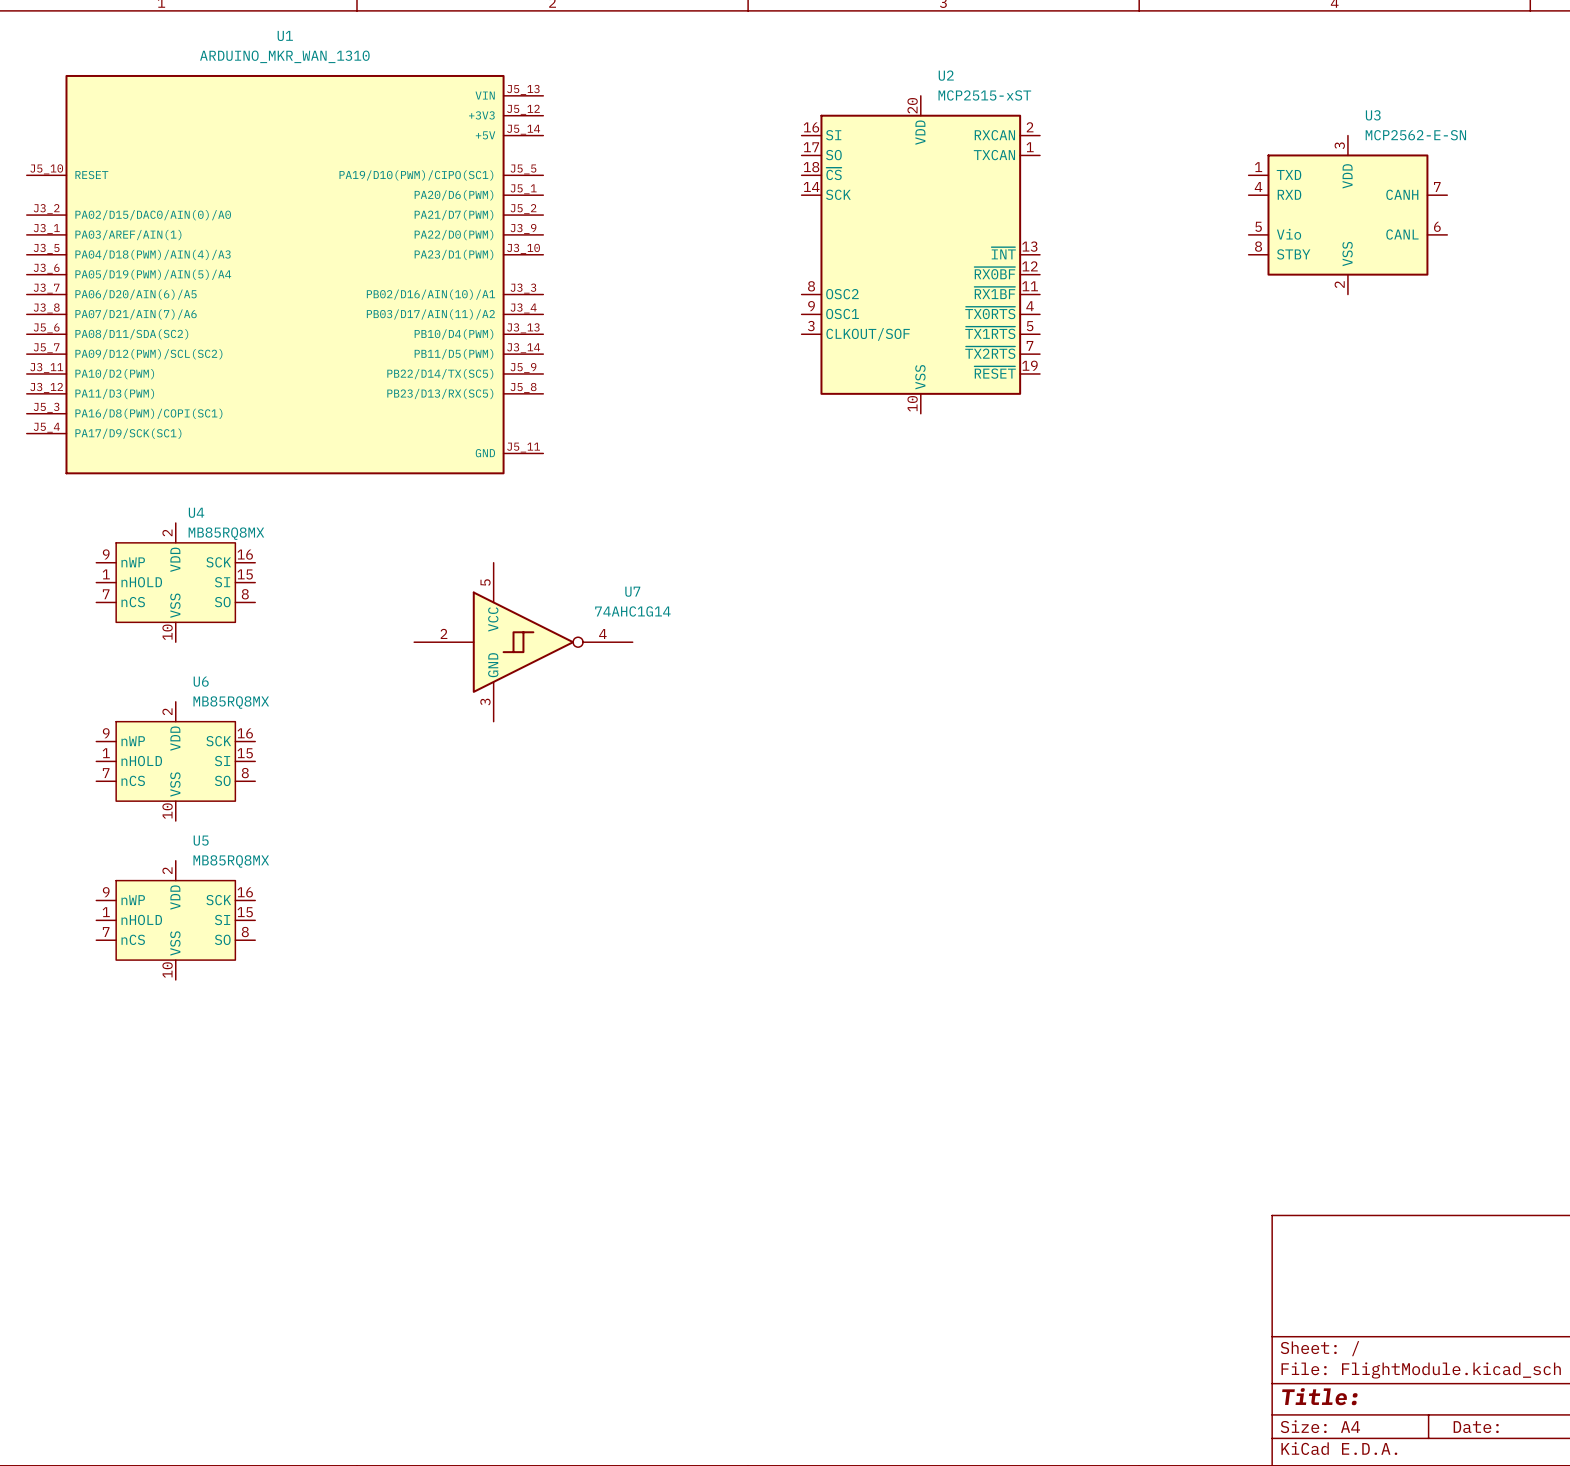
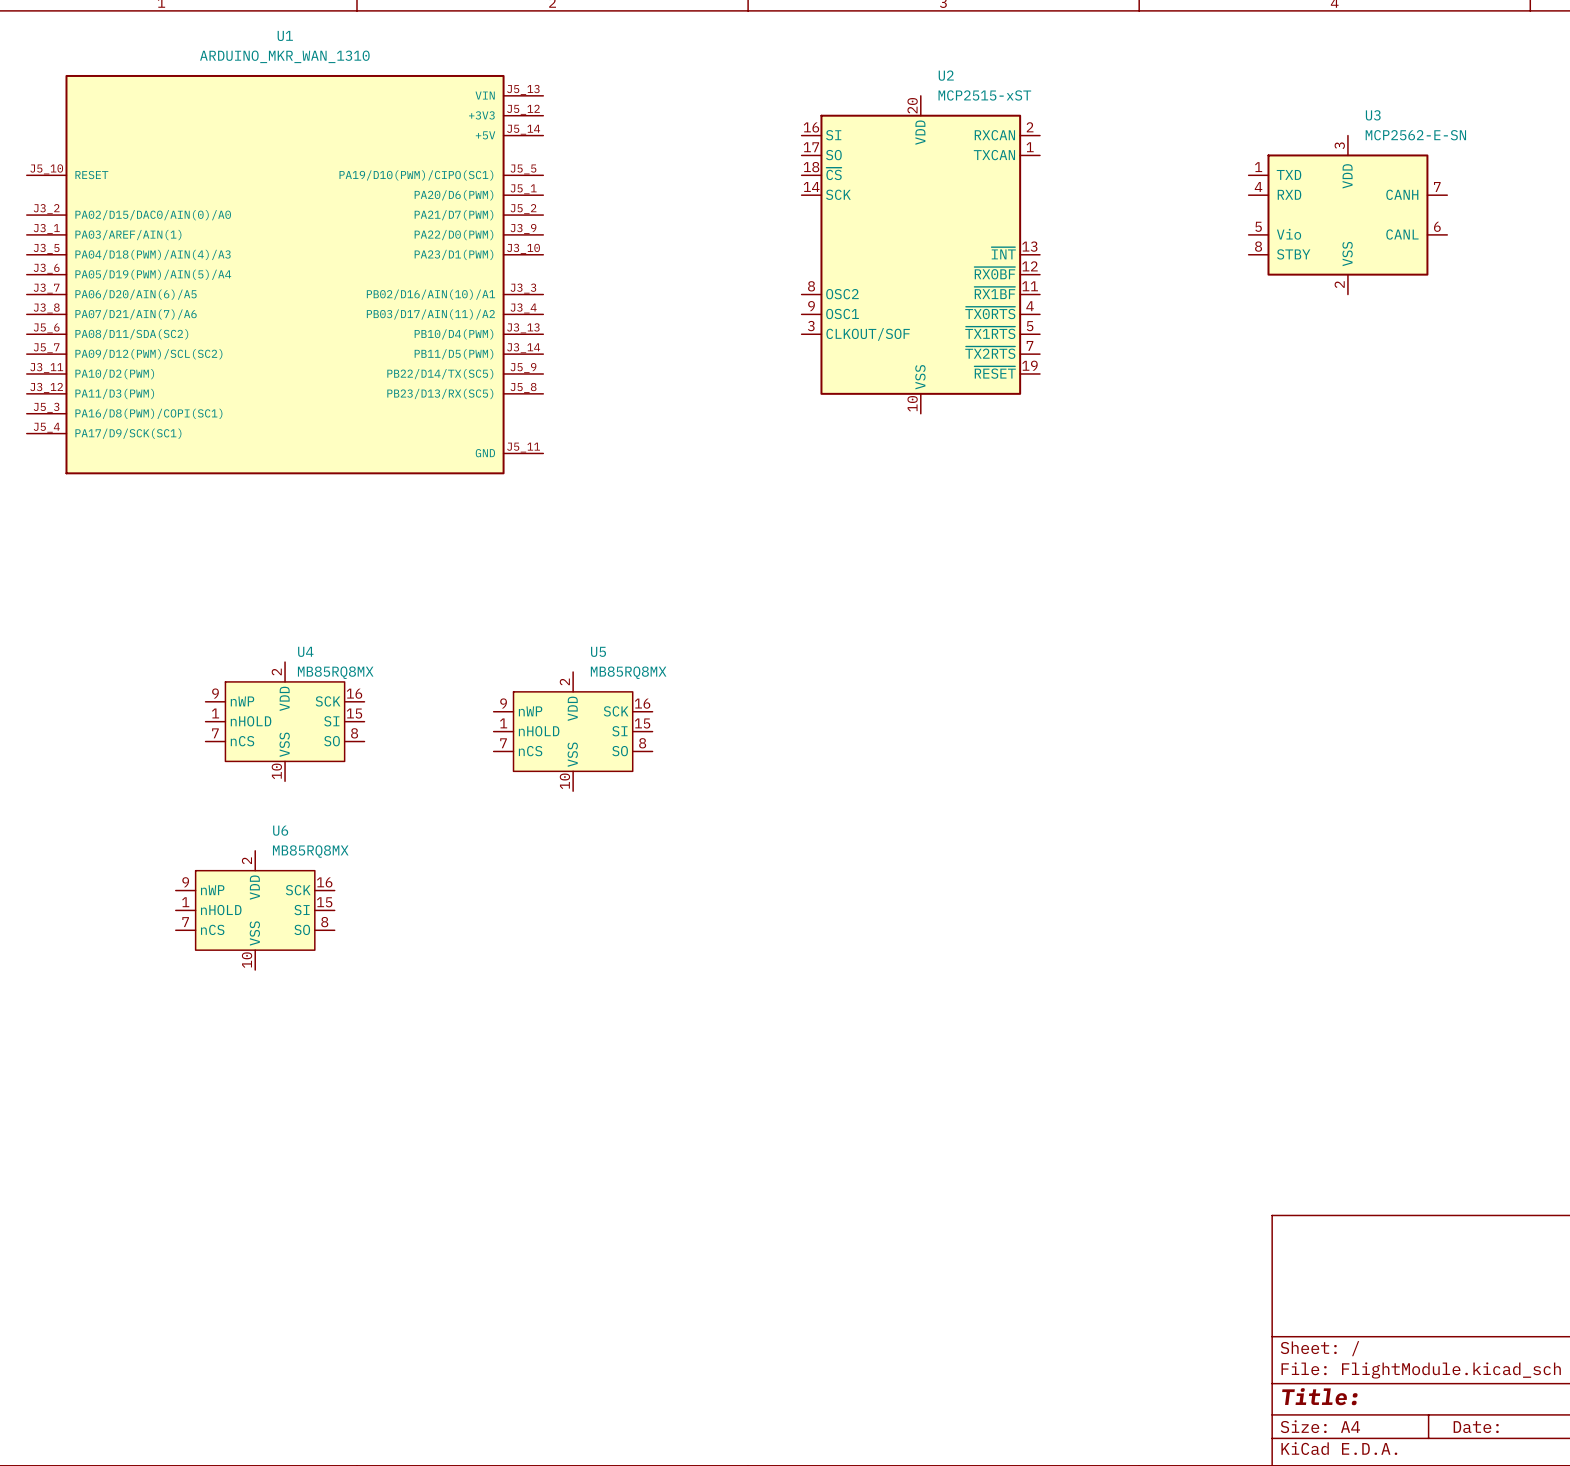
U4 position: (175, 582) -> (285, 721)
U7: 74AHC1G14 (523, 642) -> none
U6 position: (175, 761) -> (255, 910)
U5 position: (175, 920) -> (573, 731)

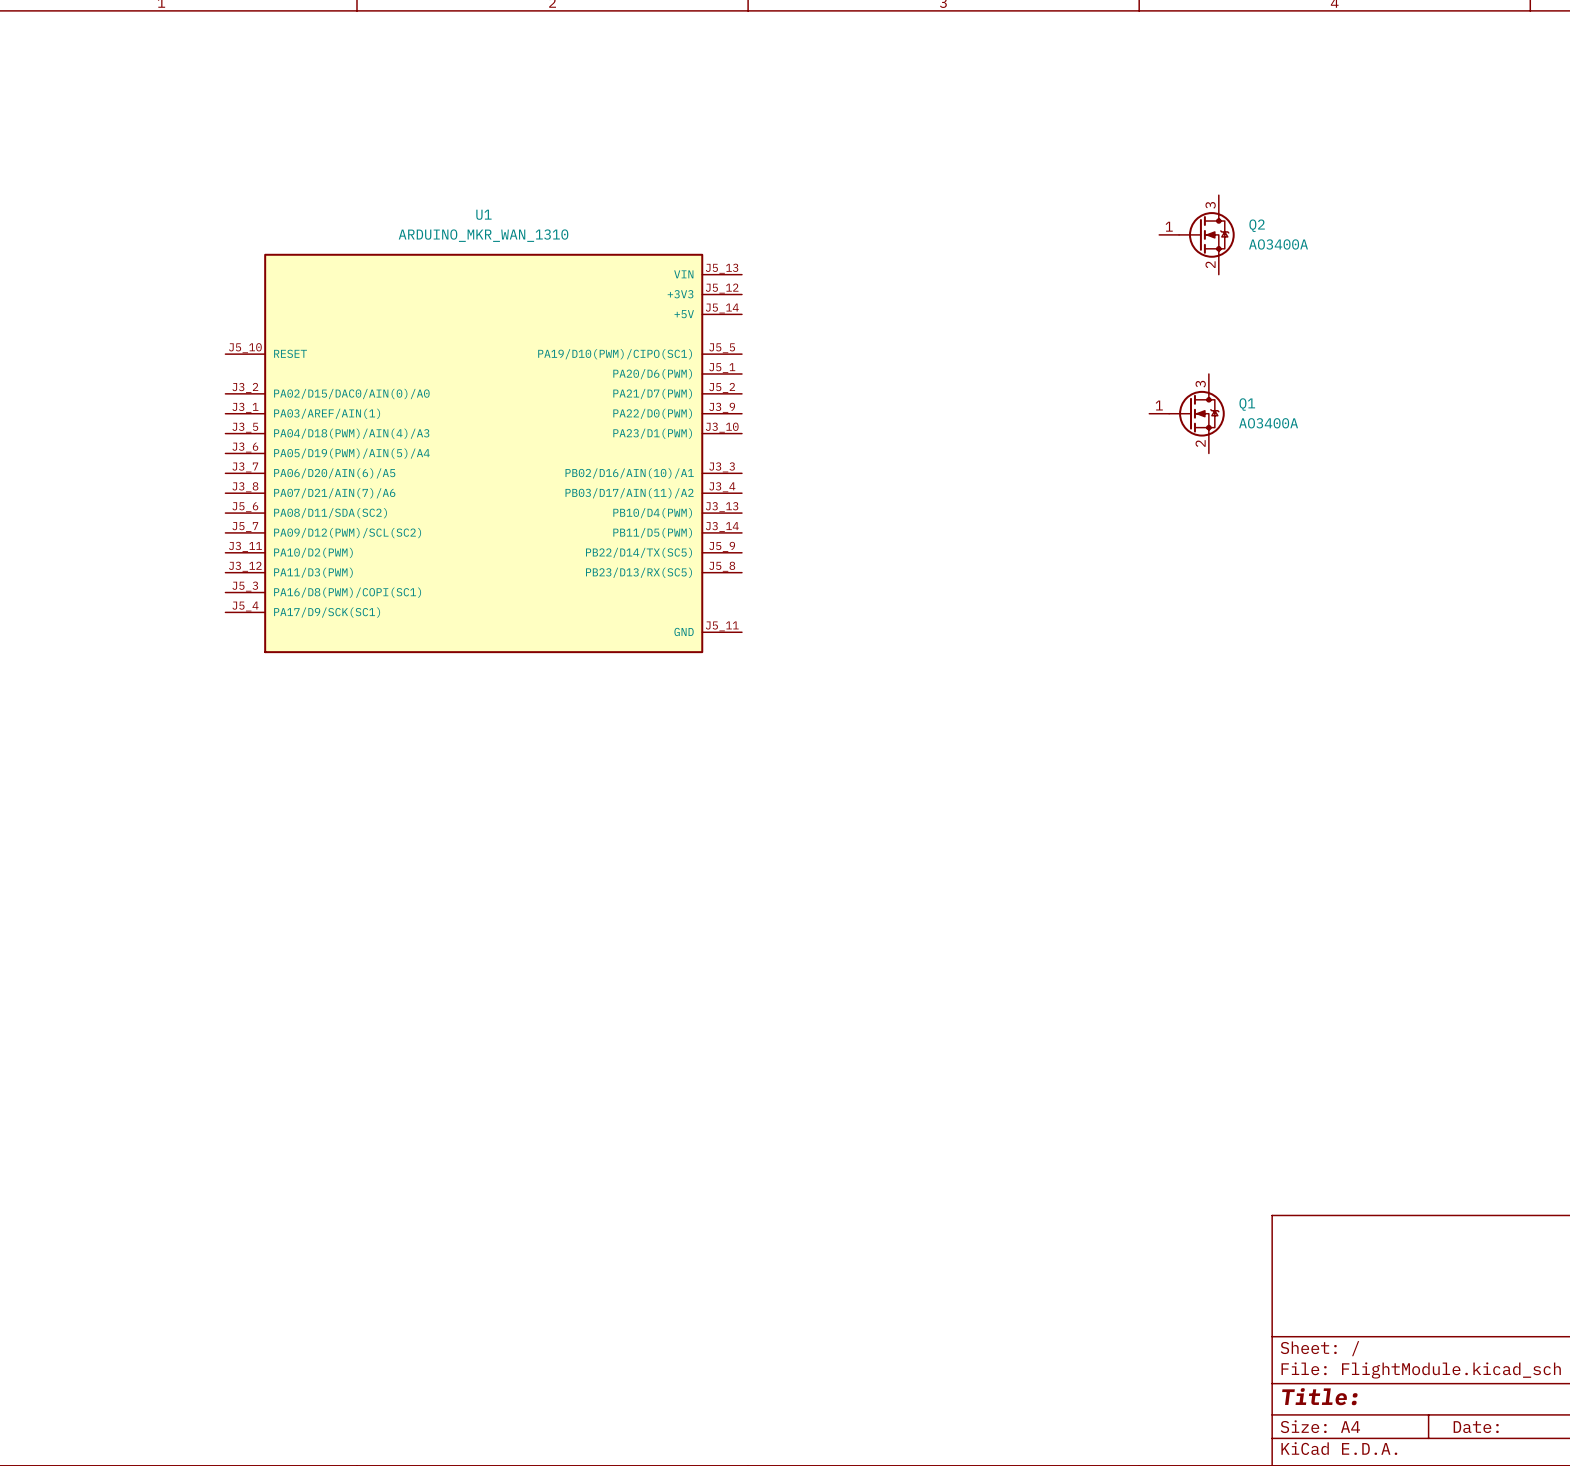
U3: MCP2562-E-SN (1347, 215) -> none
Q2: none -> AO3400A (1196, 234)
U2: MCP2515-xST (920, 254) -> none
U1 position: (285, 274) -> (483, 453)
Q1: none -> AO3400A (1187, 413)
U4: MB85RQ8MX (285, 721) -> none
U5: MB85RQ8MX (573, 731) -> none
U6: MB85RQ8MX (255, 910) -> none

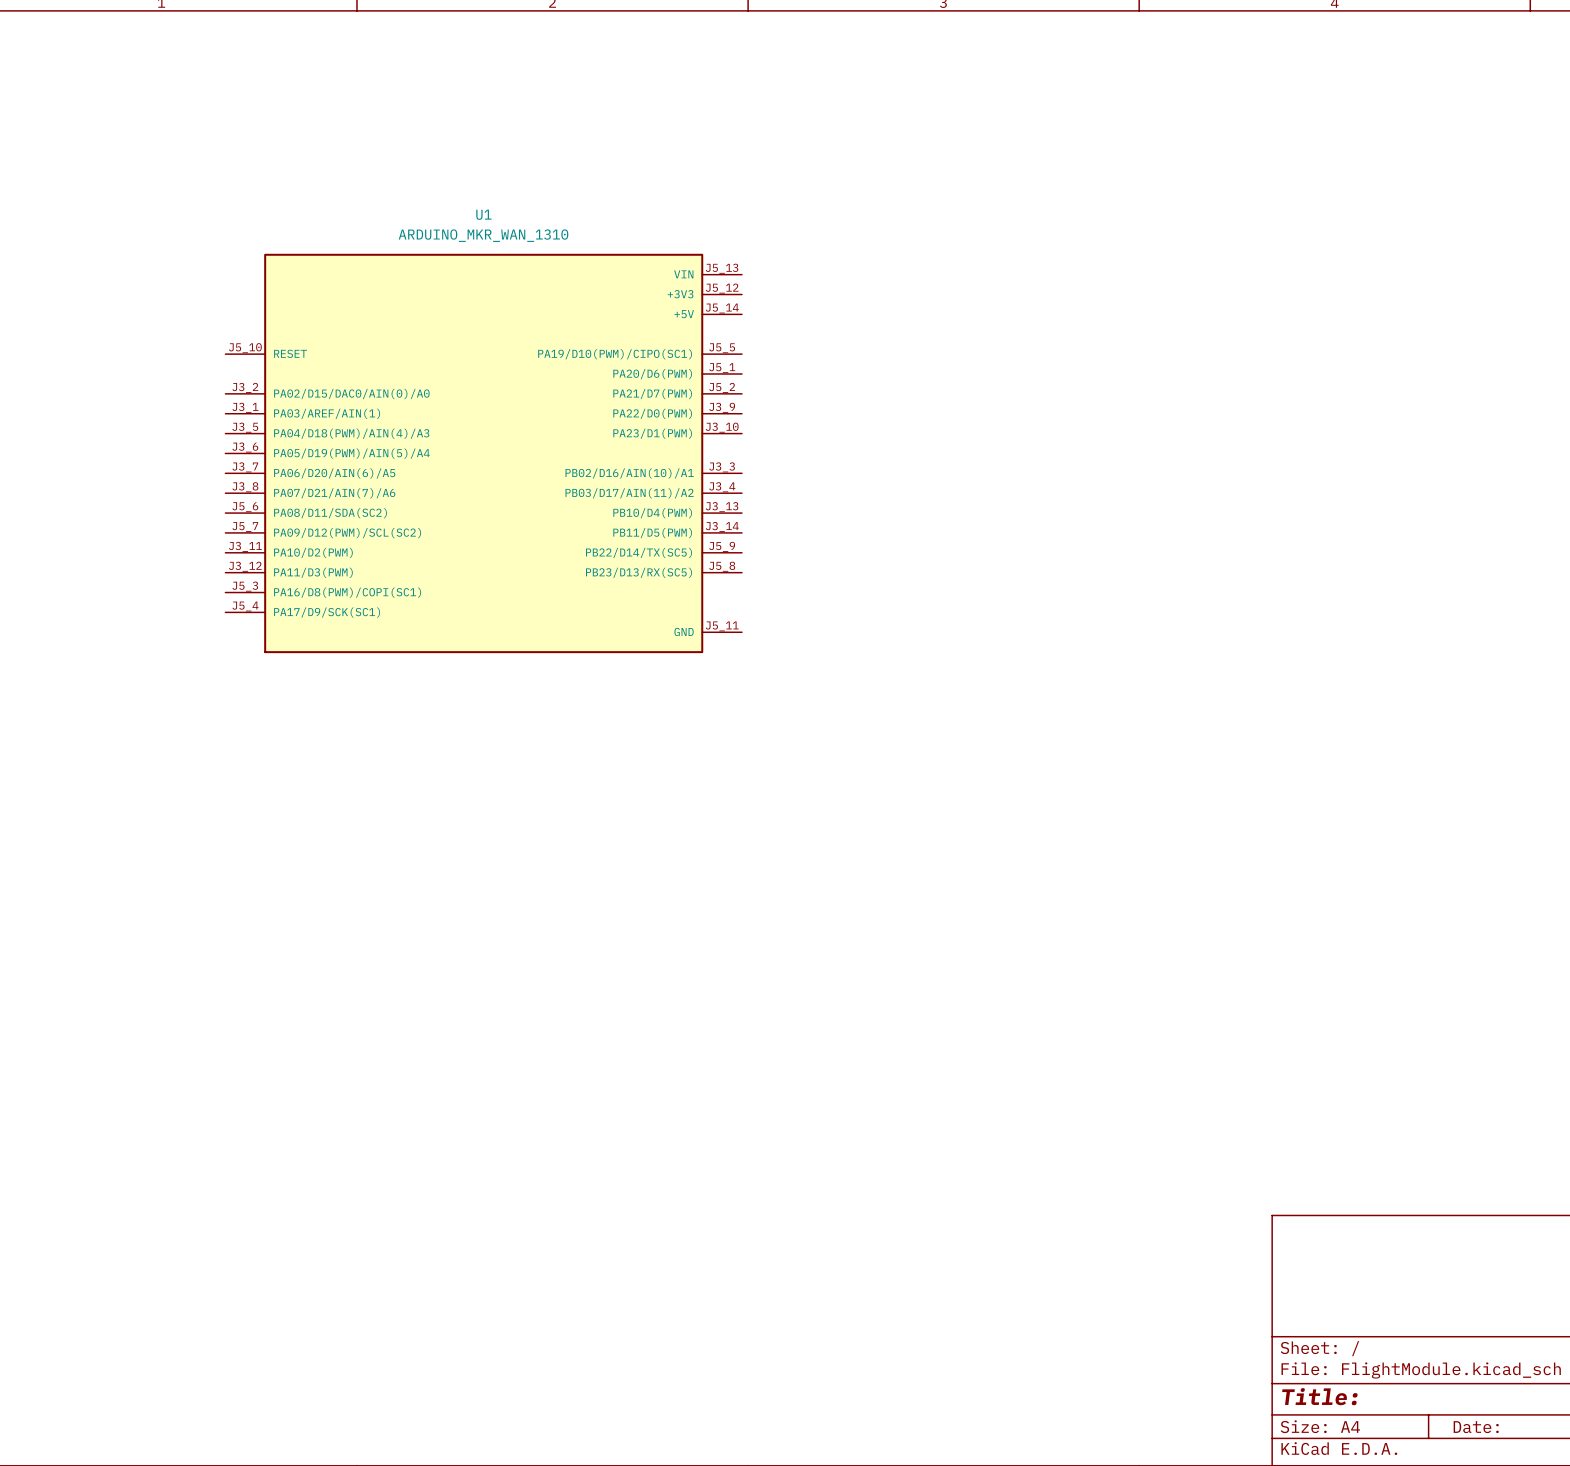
Q2: AO3400A (1196, 234) -> none
Q1: AO3400A (1187, 413) -> none

